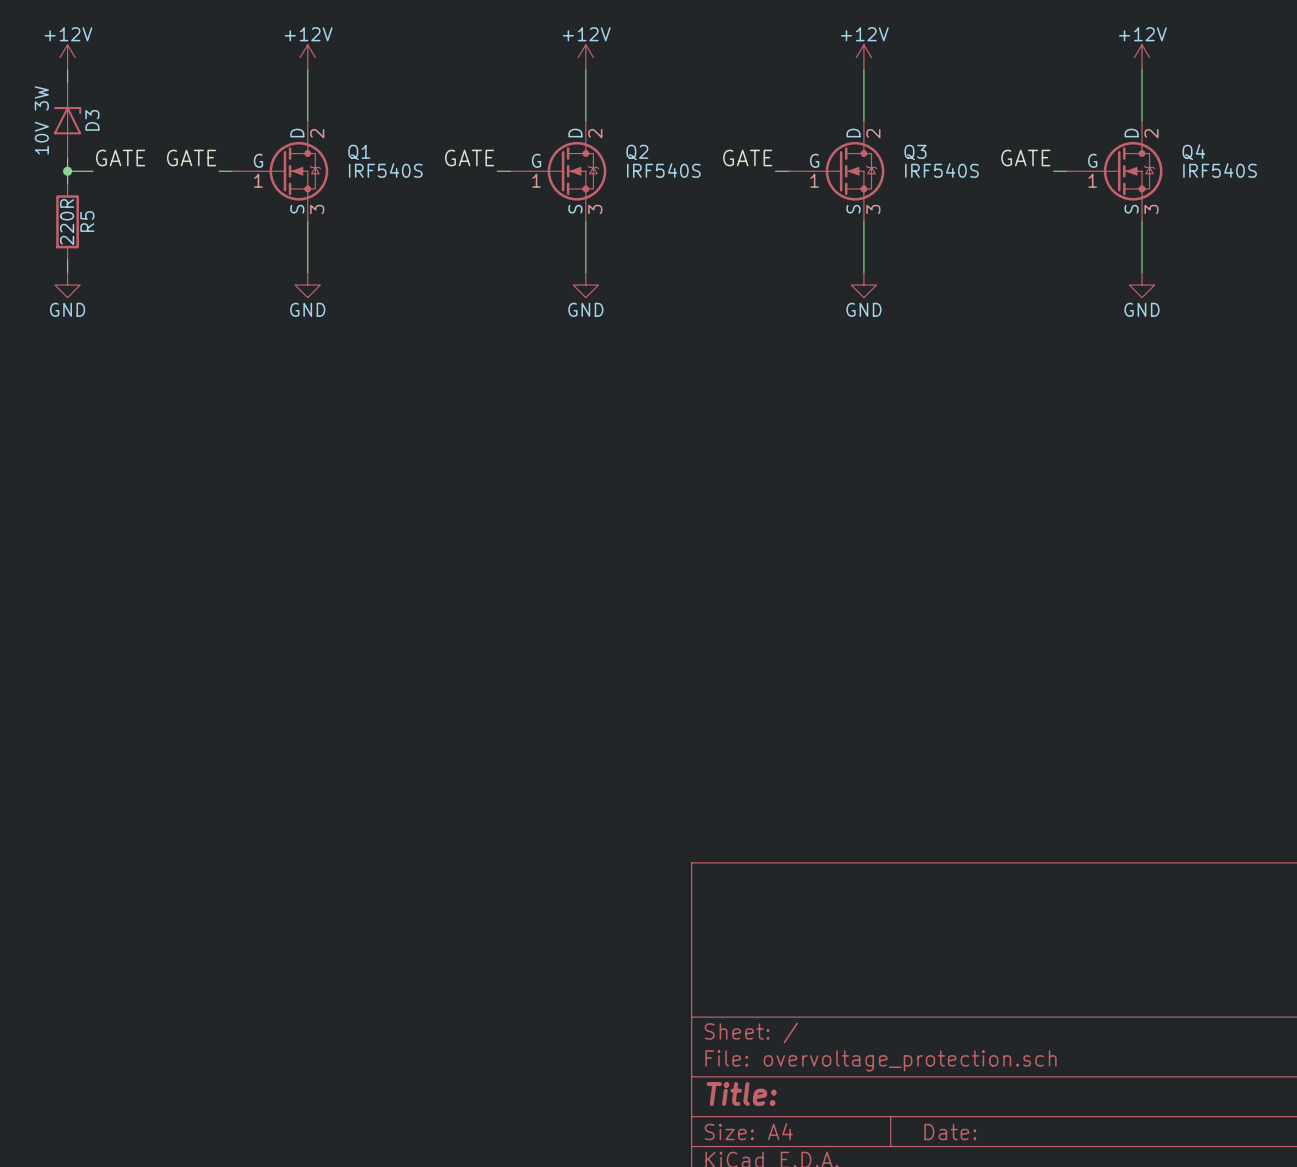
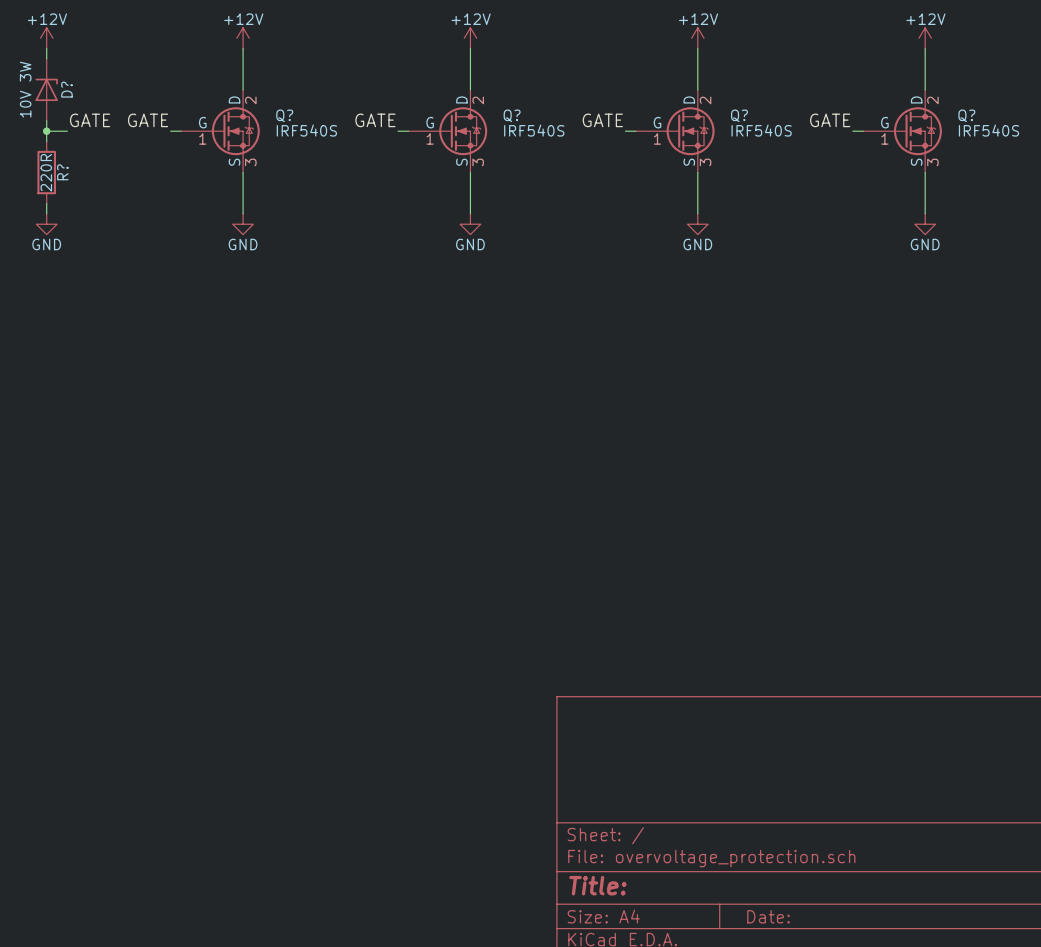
D3 name: D3 (92, 120) -> D? (66, 89)
Q1 name: Q1 (359, 152) -> Q? (284, 115)
Q2 name: Q2 (637, 152) -> Q? (512, 115)
Q3 name: Q3 (915, 152) -> Q? (739, 115)
Q4 name: Q4 (1193, 152) -> Q? (966, 115)
R5 name: R5 (87, 221) -> R? (62, 172)

